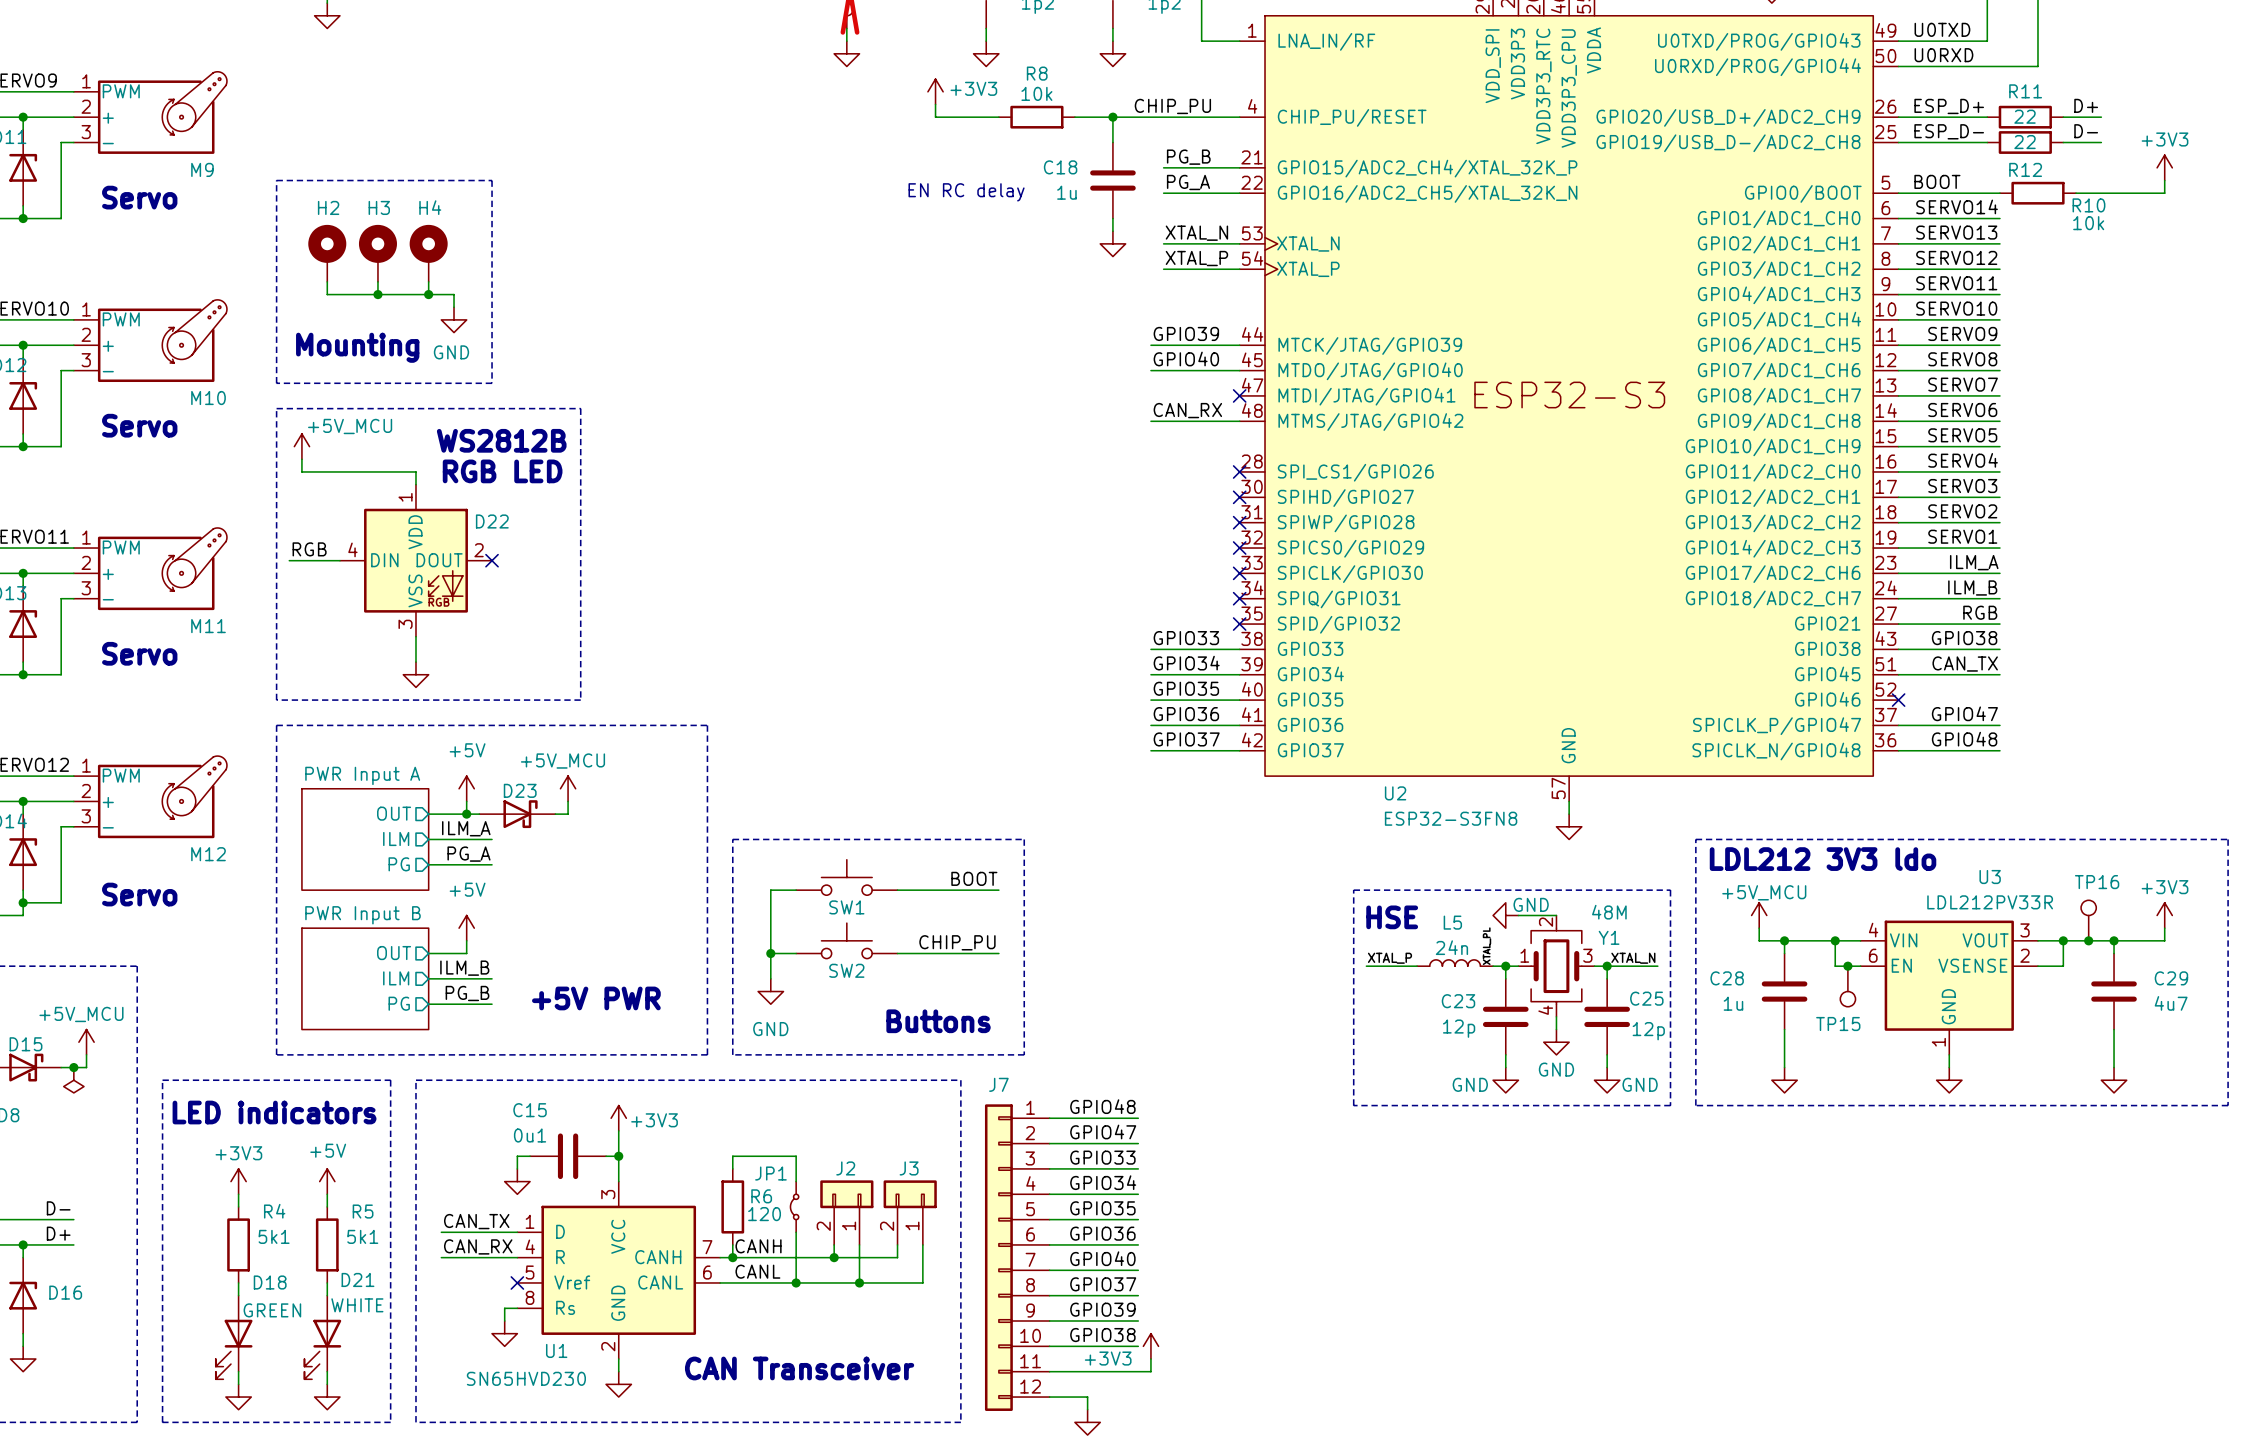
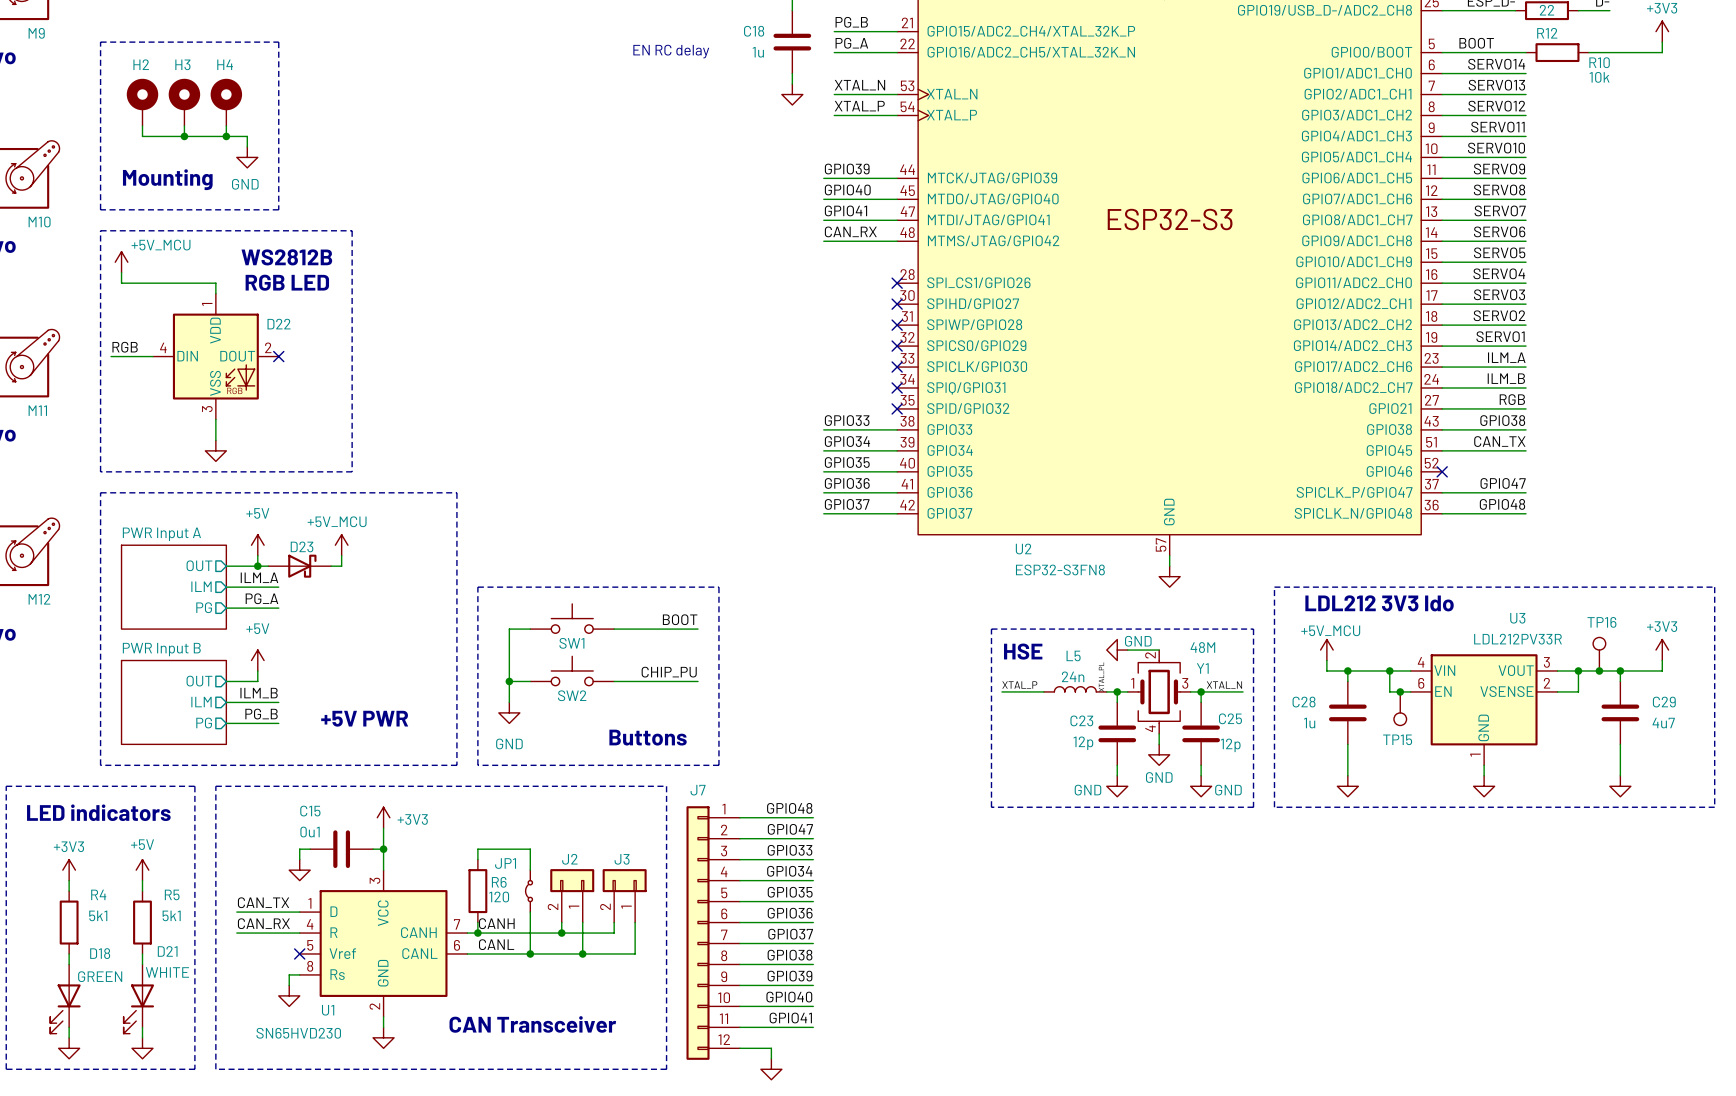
label: none -> GPIO41 (845, 210)
wire: none -> (823, 220) (897, 220)
no-connect mark: (1239, 395) -> none
label: GPIO40 (1102, 1258) -> GPIO37 (790, 934)
label: GPIO37 (1103, 1284) -> GPIO38 (790, 955)
label: GPIO38 (1102, 1335) -> GPIO40 (789, 997)
power symbol: +3V3 (1150, 1346) -> none
wire: (1150, 1359) (1150, 1371) (1138, 1371) -> none
label: none -> GPIO41 (790, 1018)

